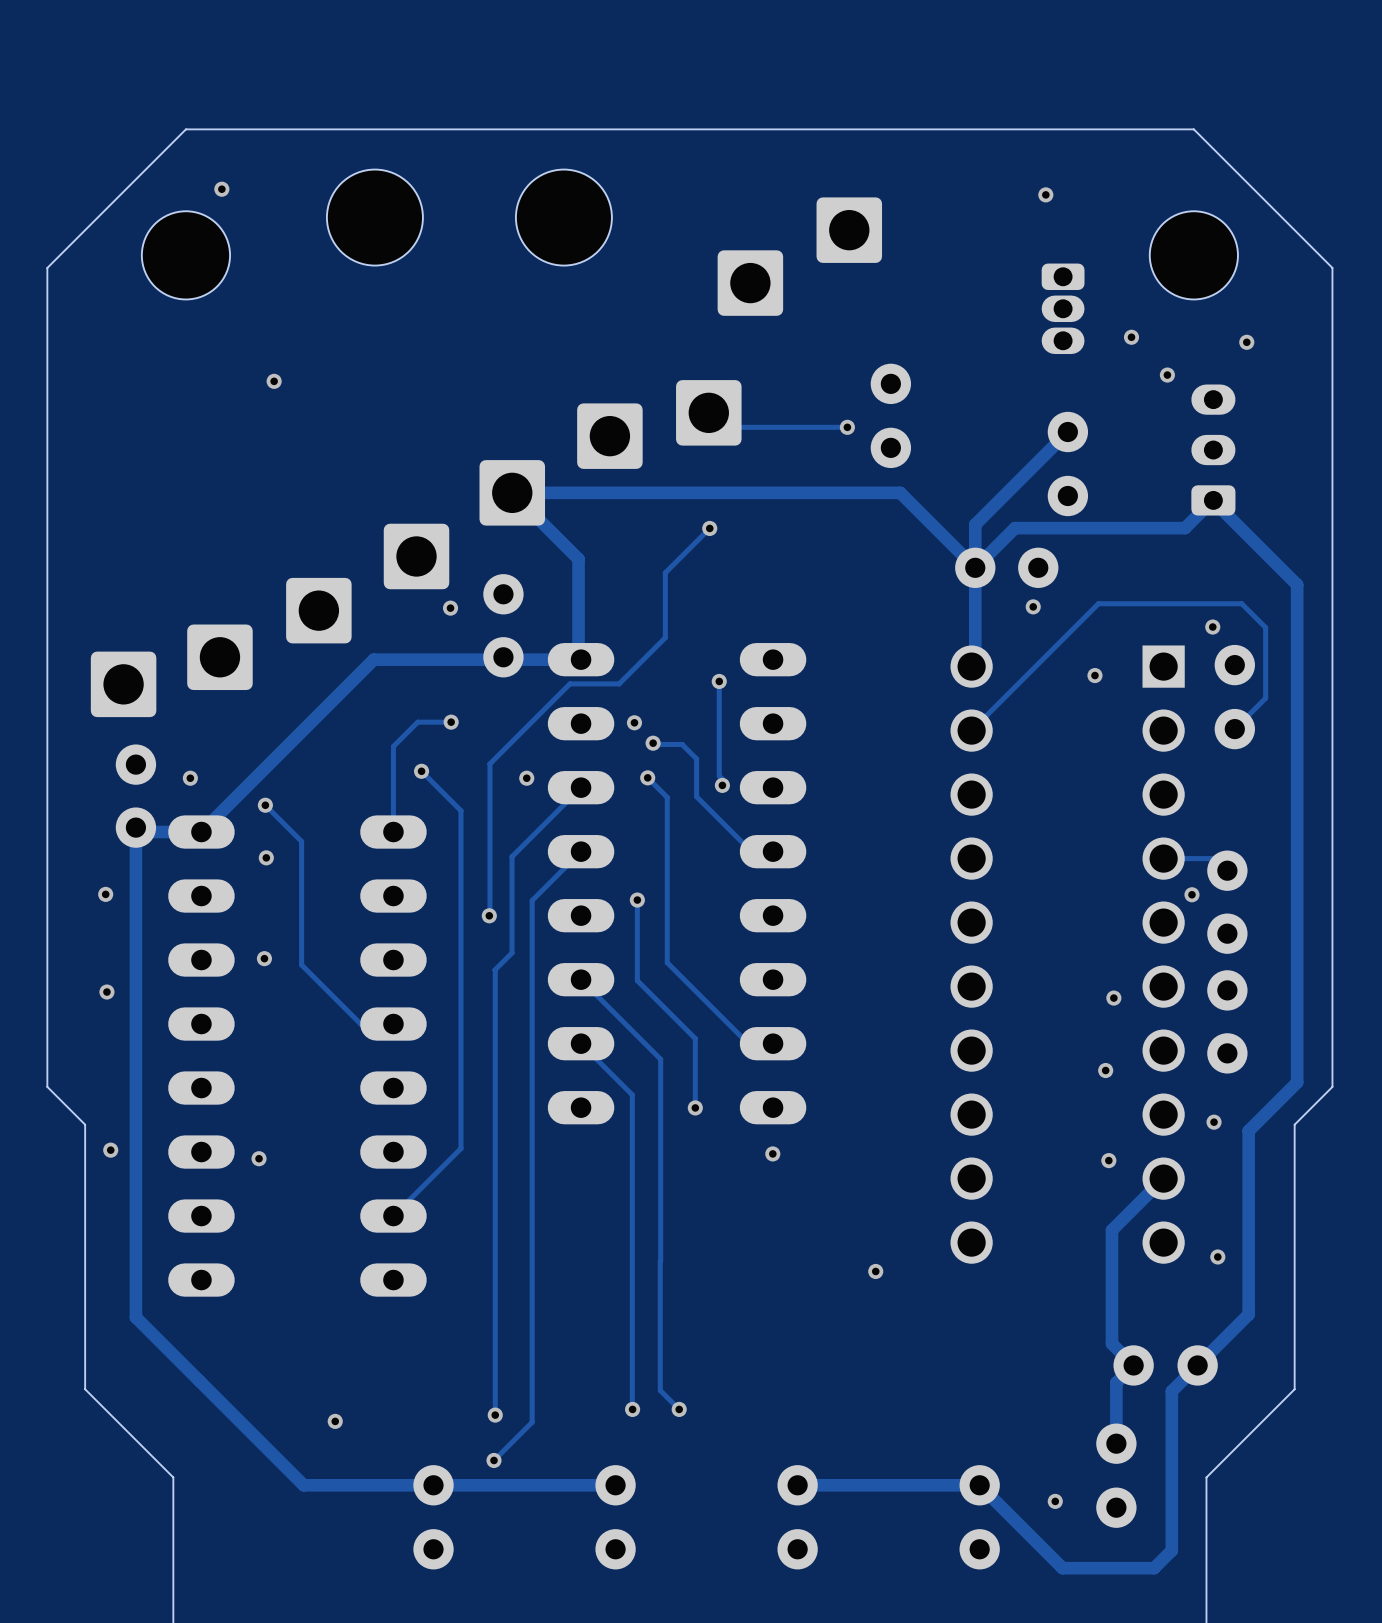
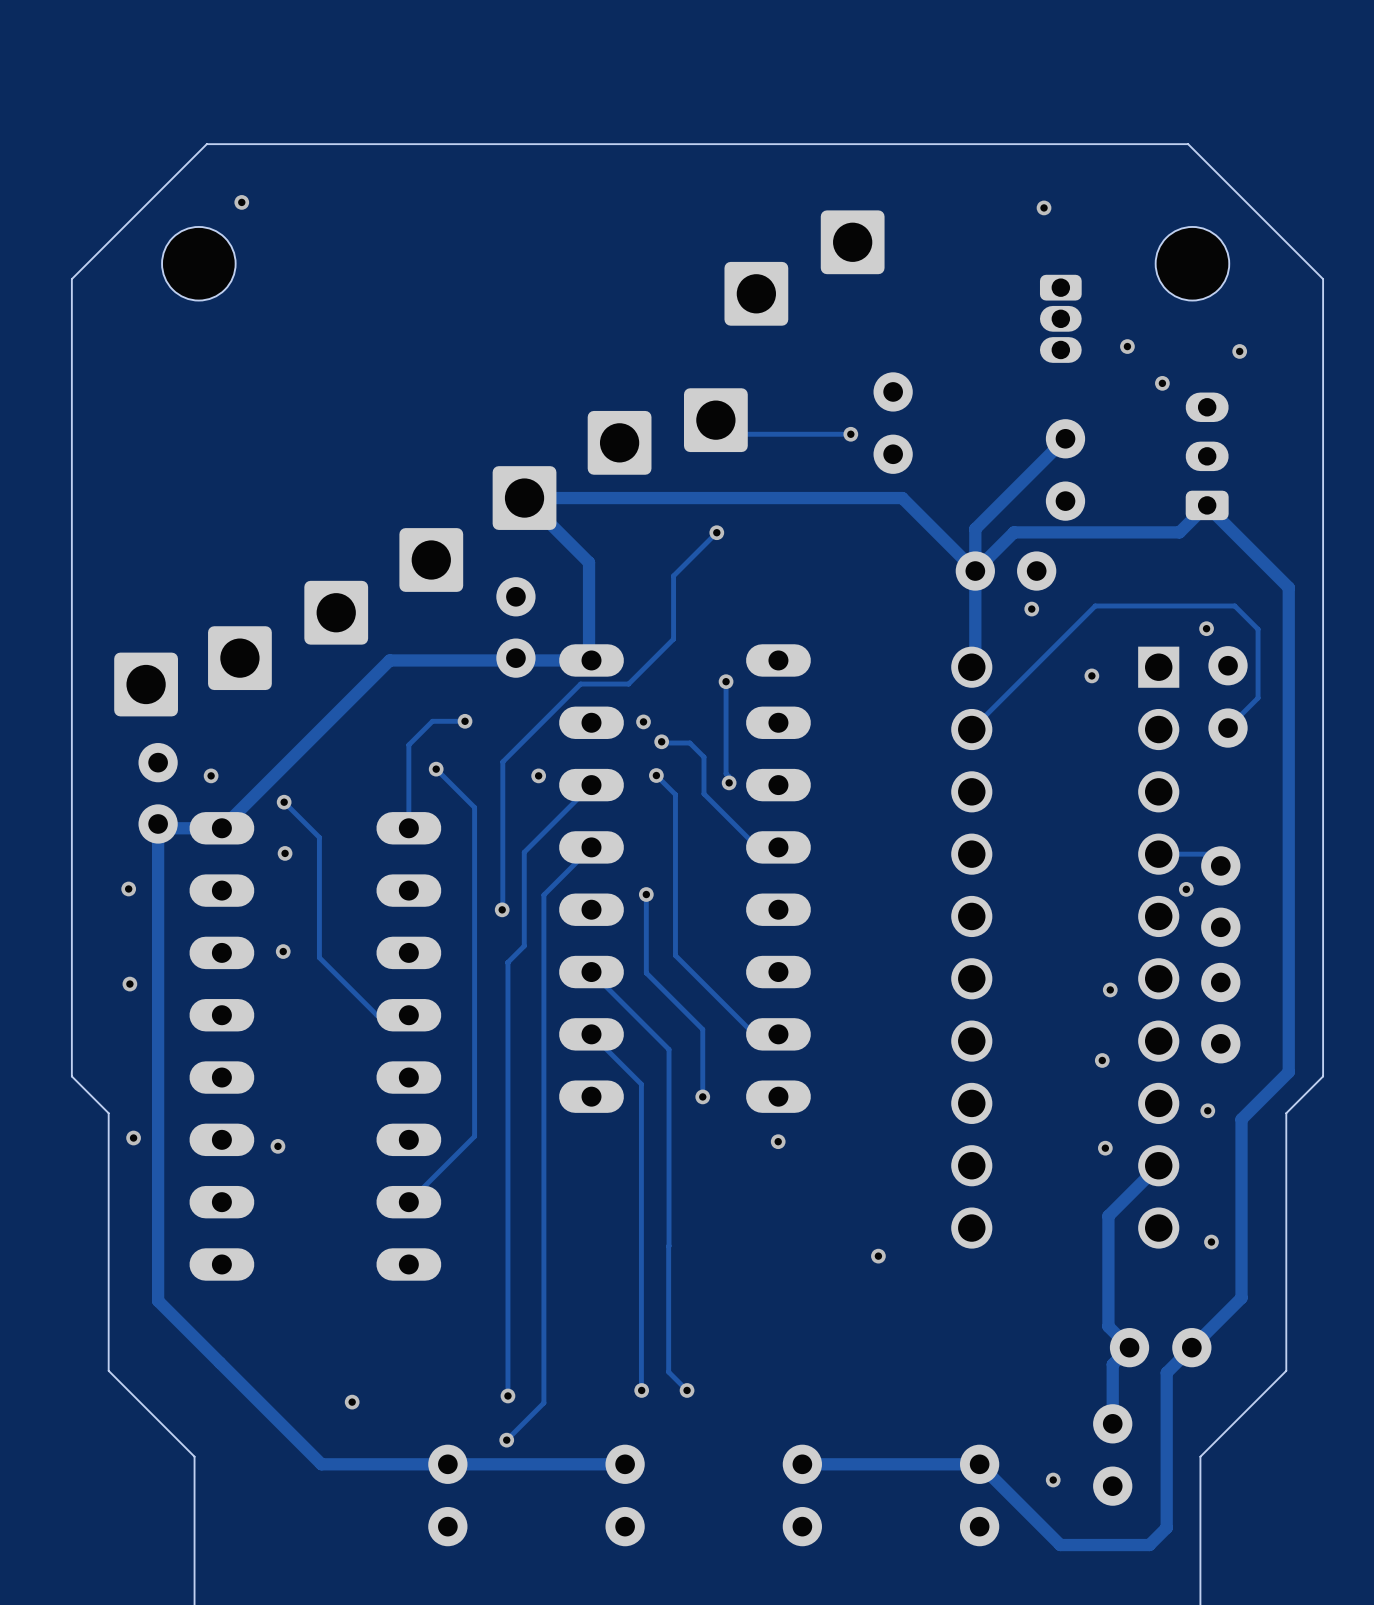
part footprint: [141, 211, 231, 300] -> [162, 226, 236, 301]
part footprint: [1149, 211, 1238, 300] -> [1155, 226, 1230, 301]
part: (374, 217) -> none
part: (563, 217) -> none
via: (274, 381) -> none
via: (450, 608) -> none

